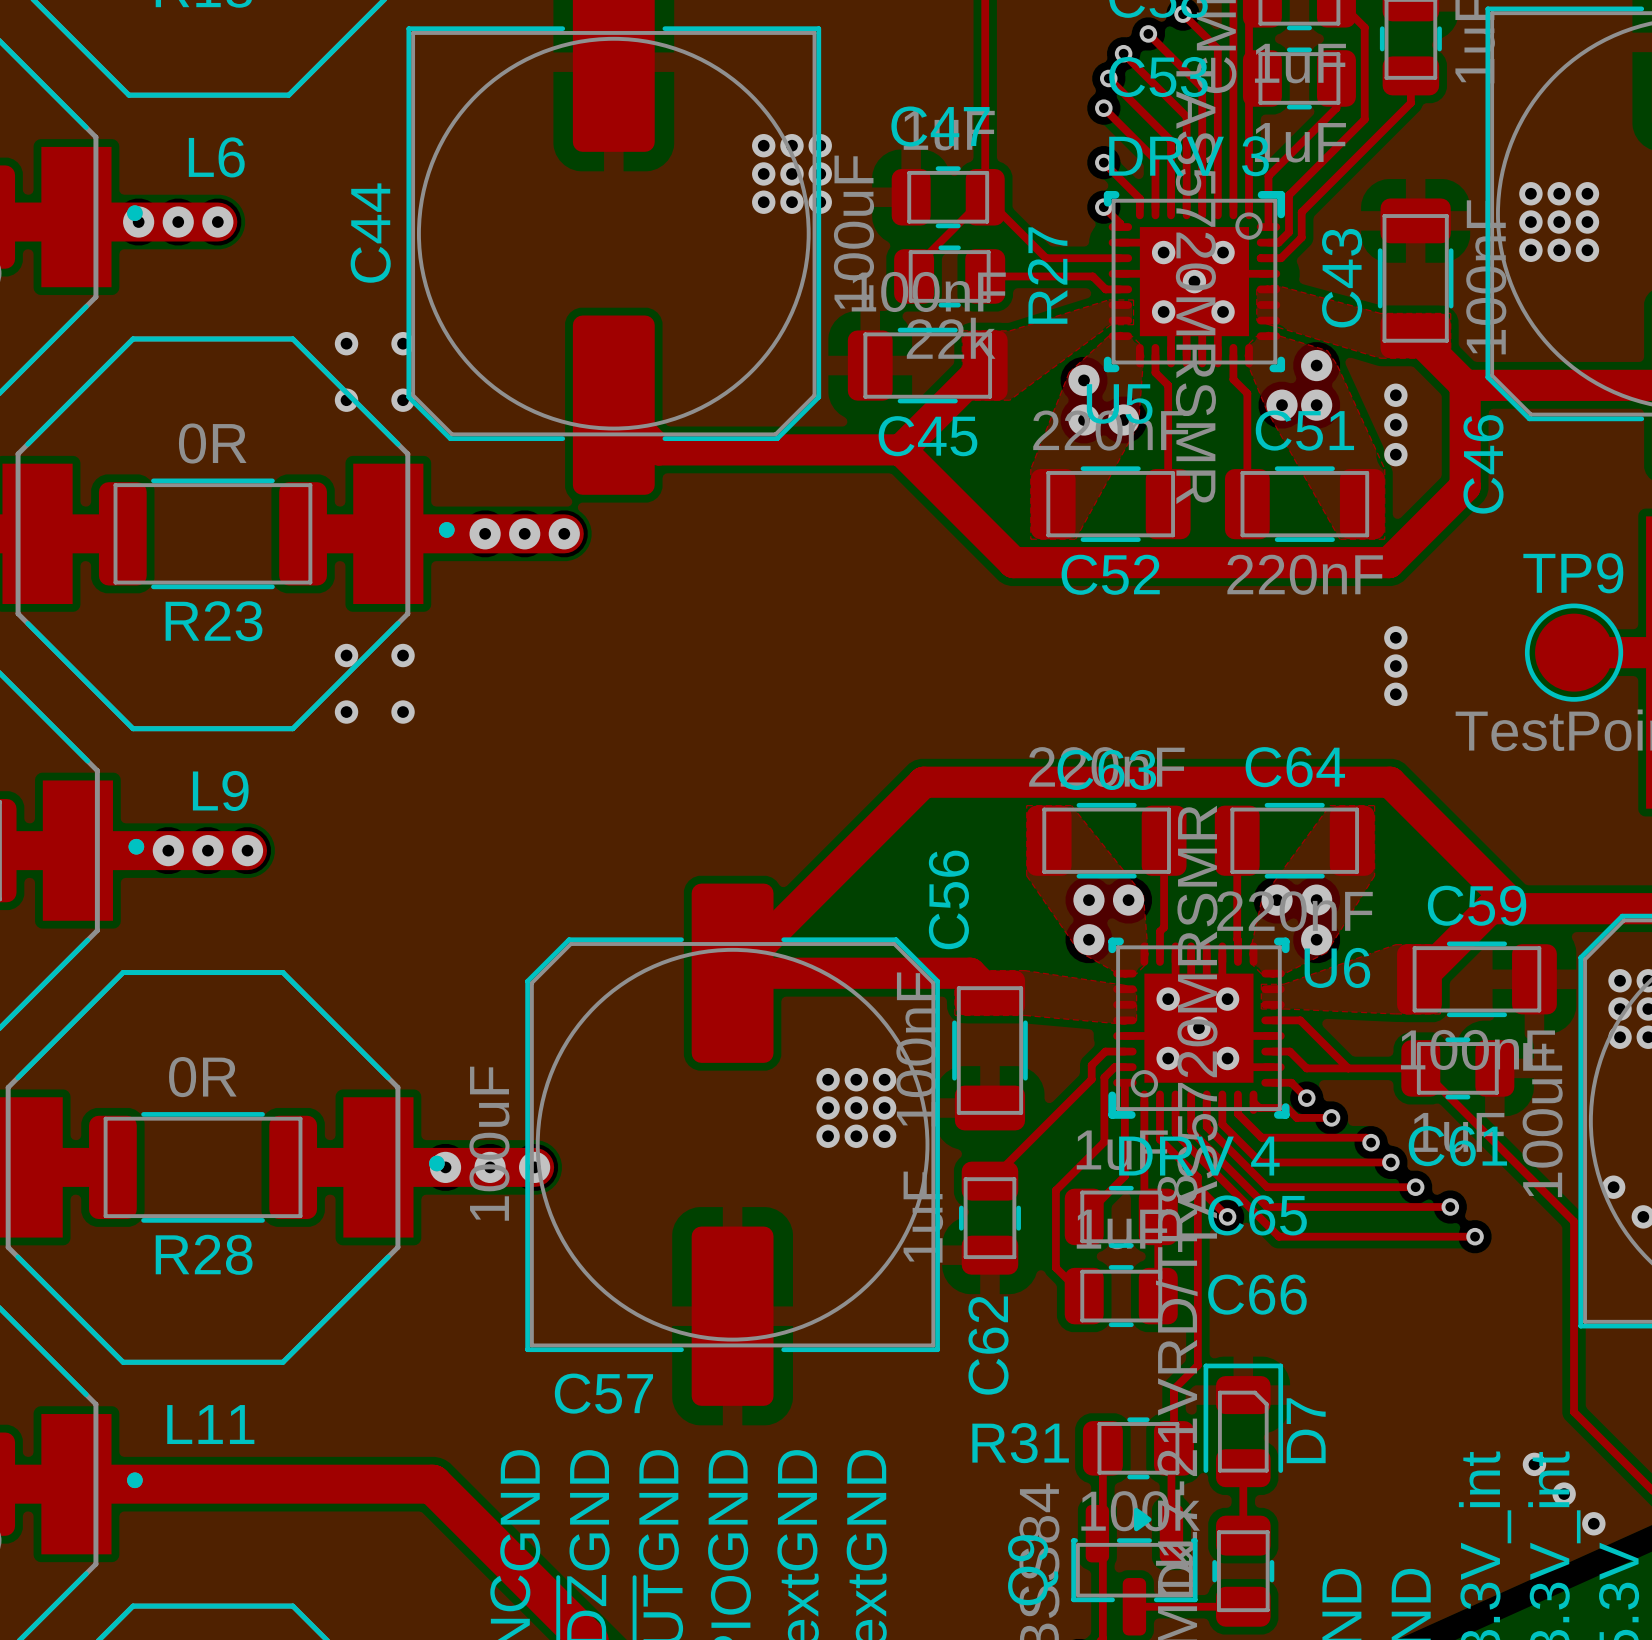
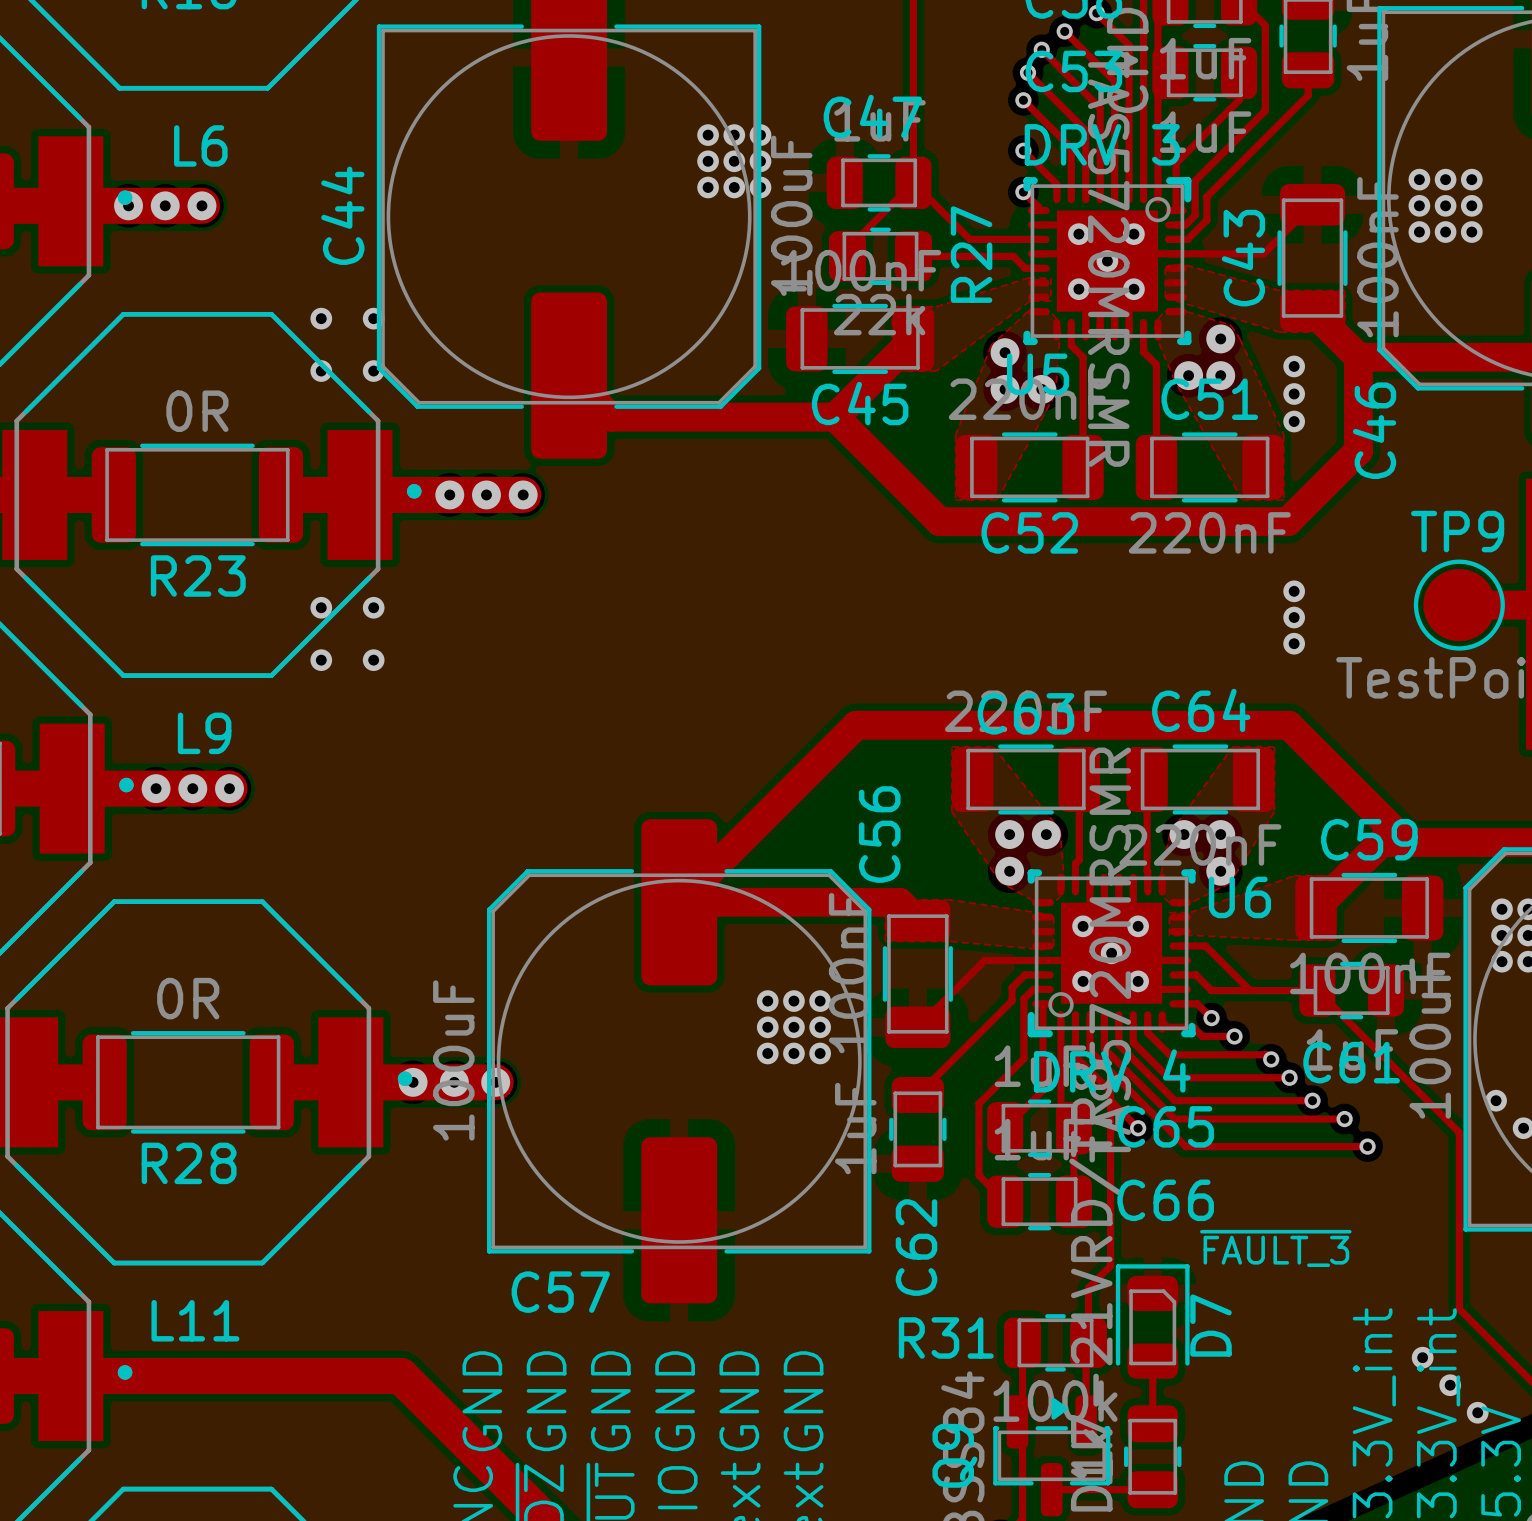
top track: none -> (1312, 204) (1263, 253) (1176, 253)
top track: none -> (1042, 960) (984, 960) (917, 1027)
text: none -> ~{FAULT_3} (1275, 1248)

